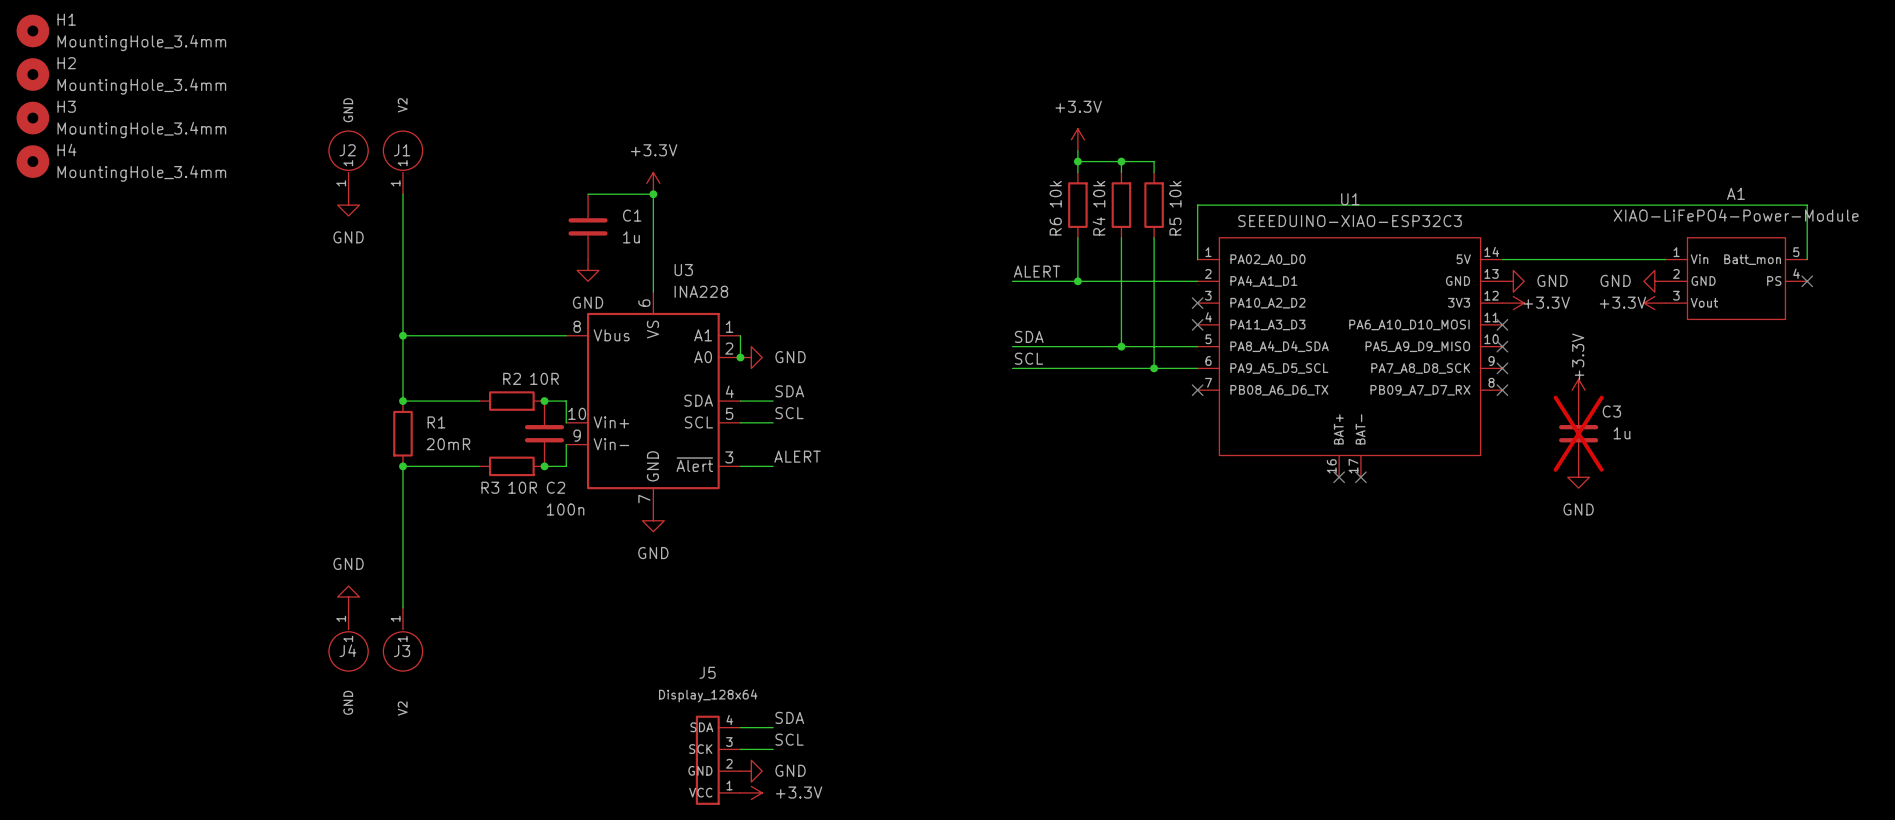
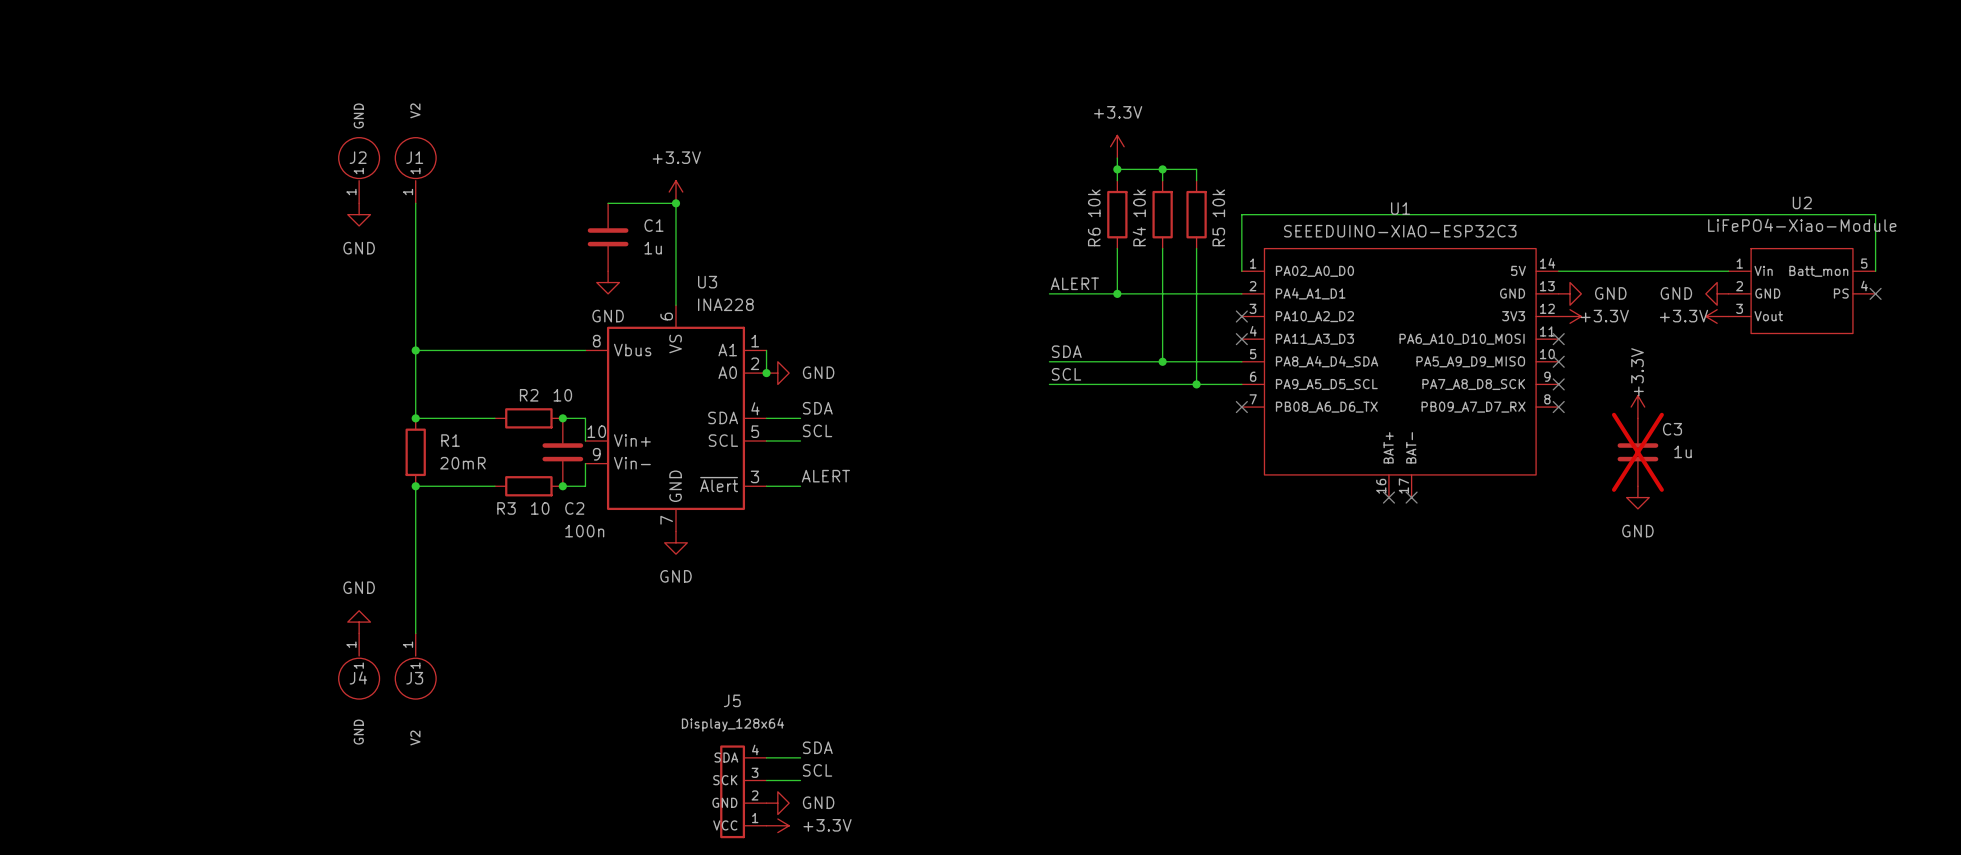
H1: MountingHole_3.4mm (32, 30) -> none
H2: MountingHole_3.4mm (32, 74) -> none
H3: MountingHole_3.4mm (32, 118) -> none
H4: MountingHole_3.4mm (32, 161) -> none
A1 name: A1 (1735, 193) -> U2 (1802, 202)
A1 value: XIAO-LiFePO4-Power-Module (1736, 215) -> LiFePO4-Xiao-Module (1802, 225)
R2 value: 10R (544, 378) -> 10 (562, 395)
R3 value: 10R (522, 487) -> 10 (540, 508)

